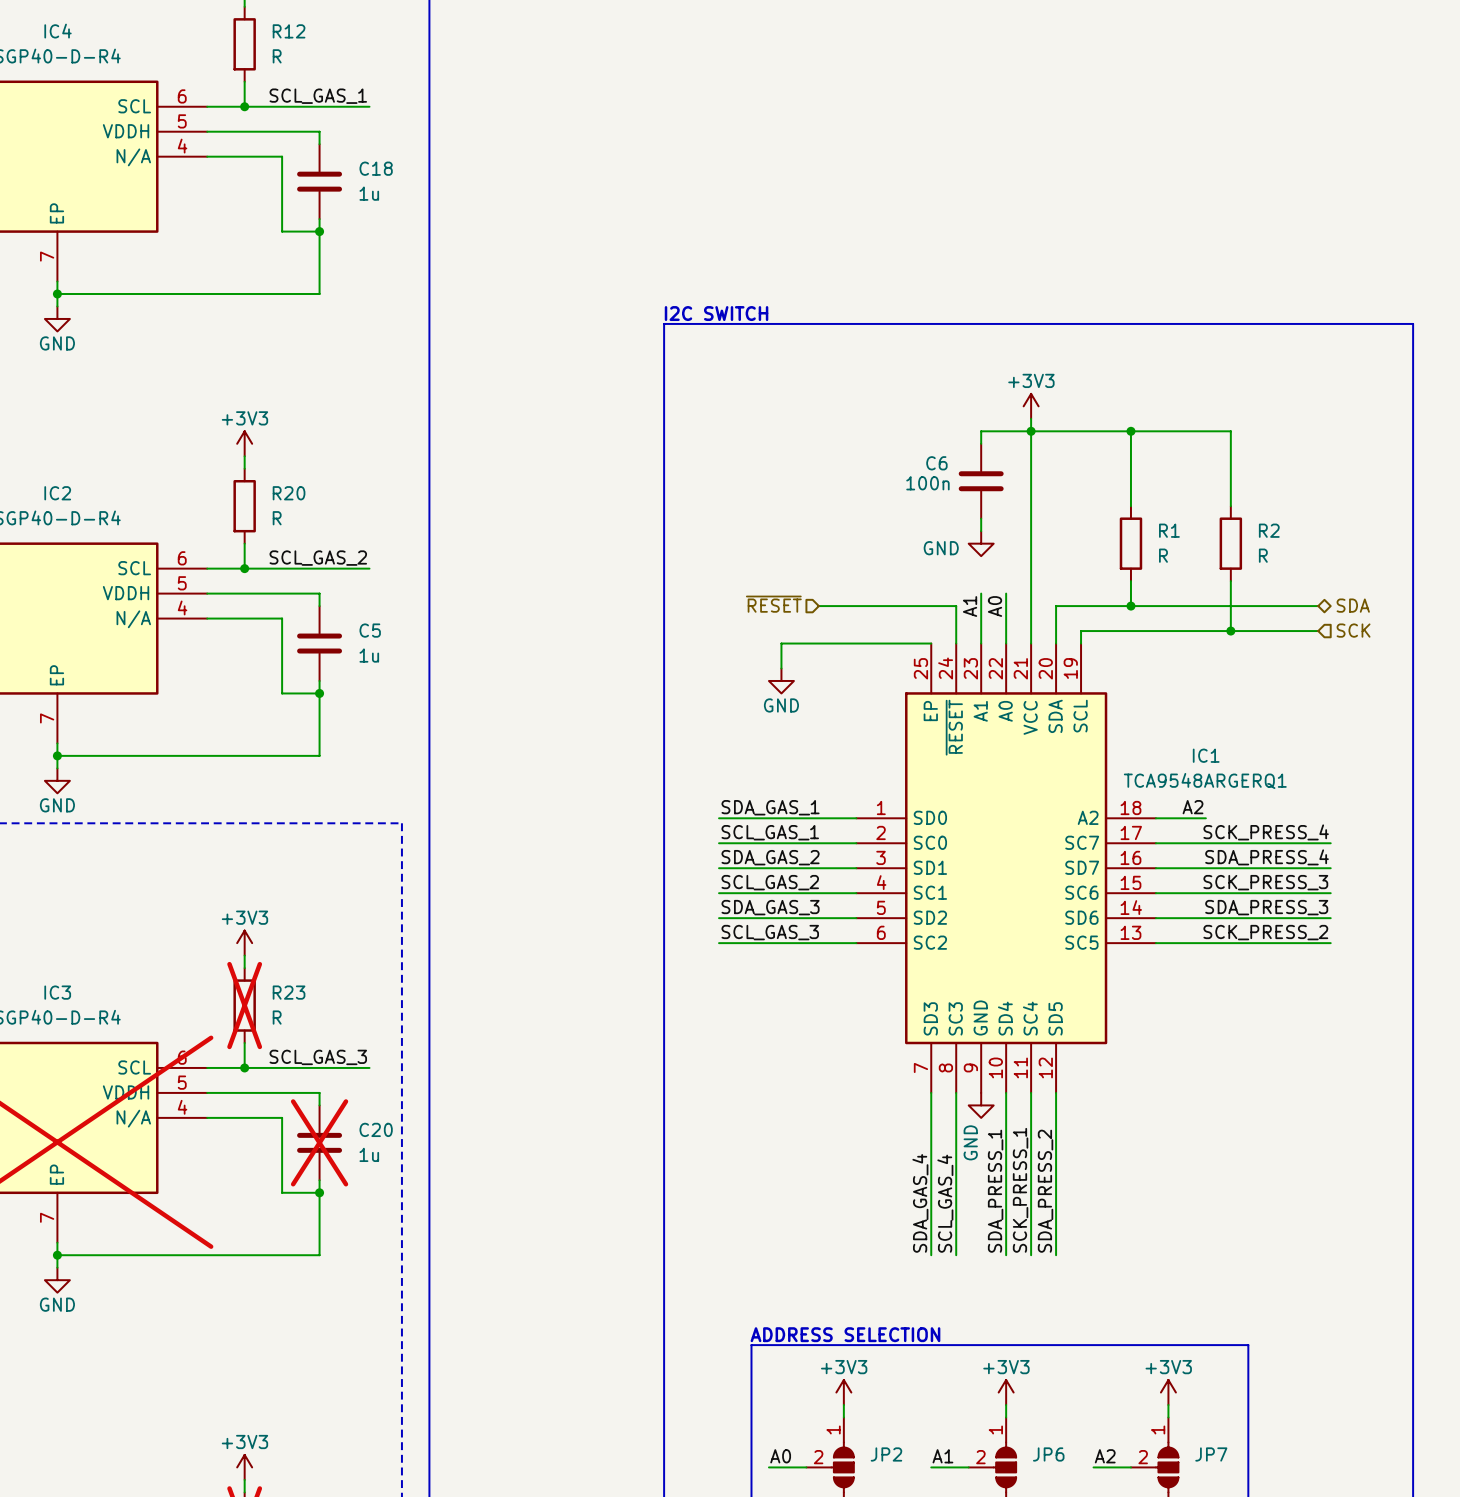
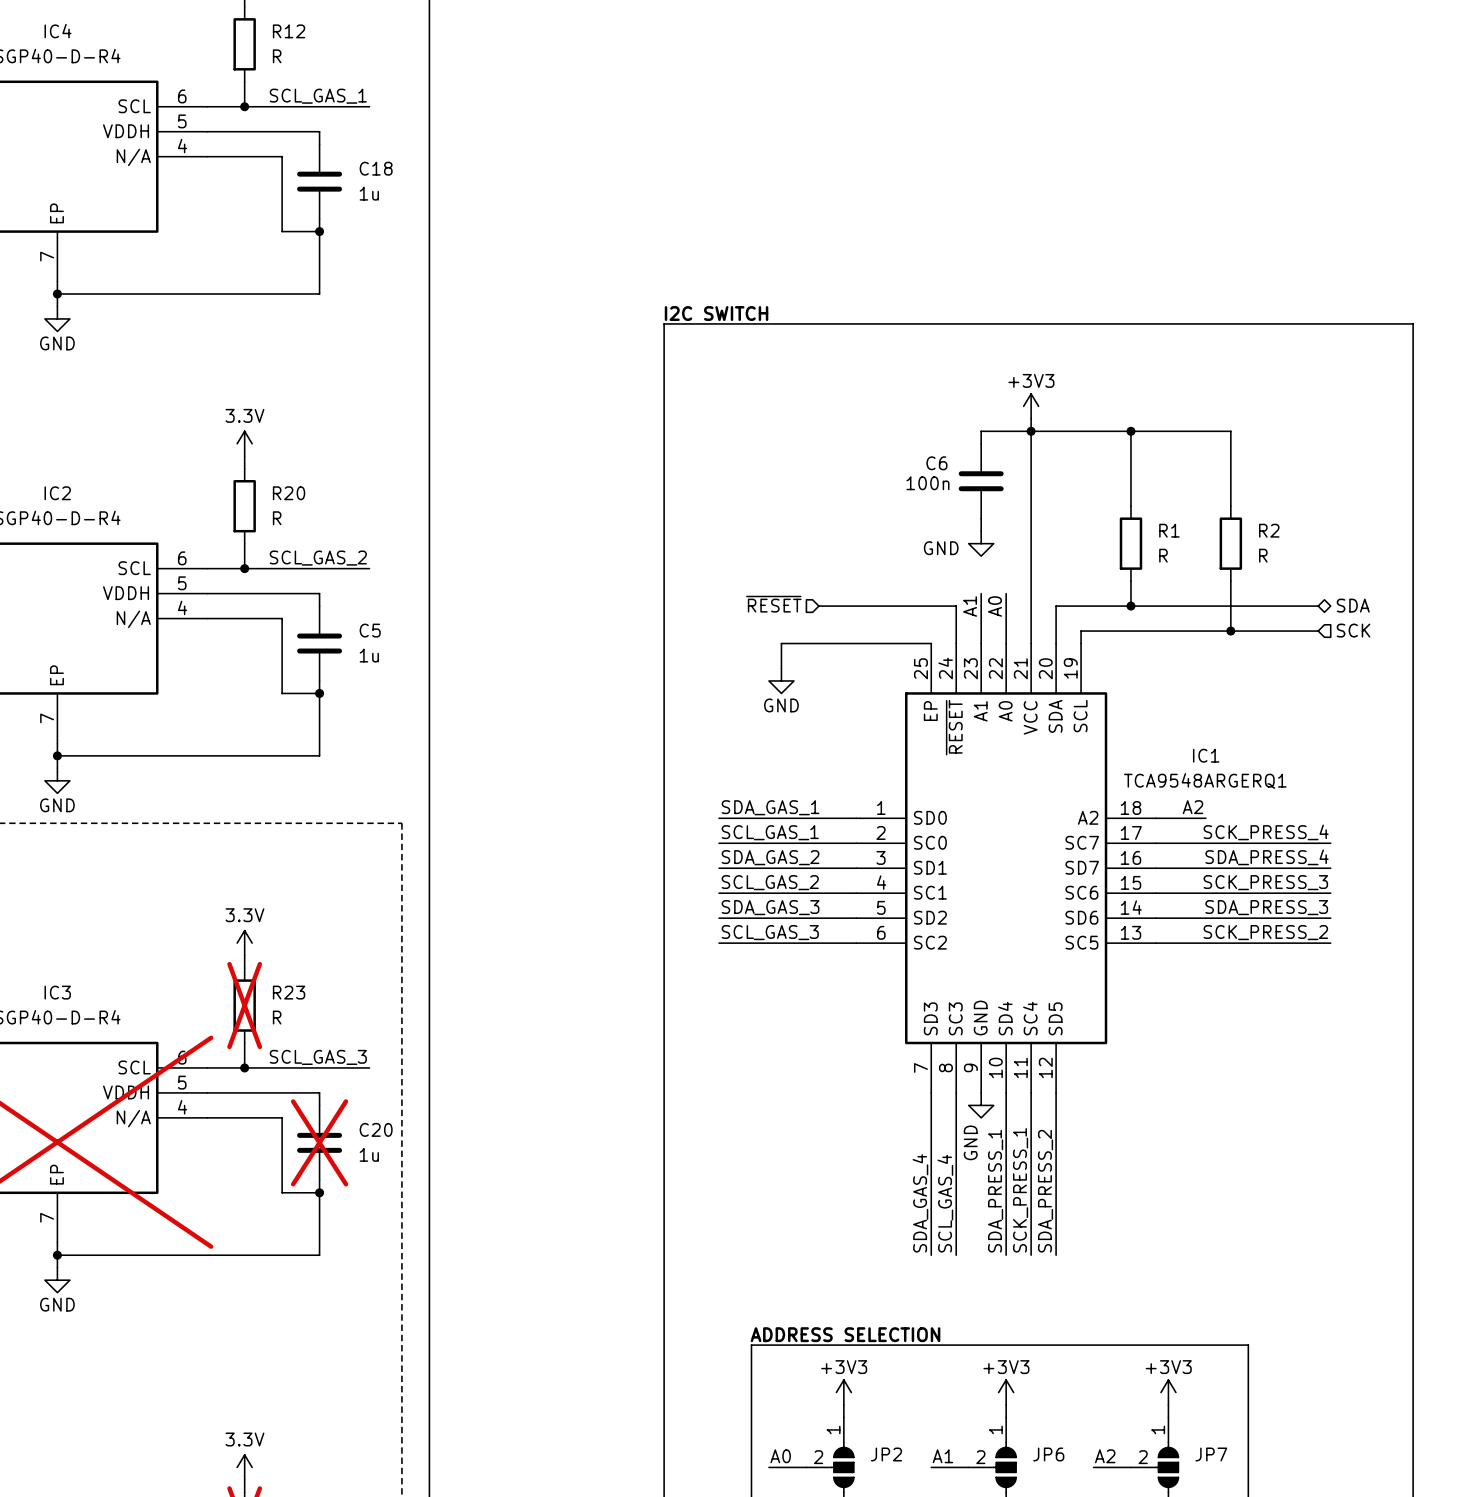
power symbol: +3V3 (244, 443) -> 3.3V (244, 443)
power symbol: +3V3 (244, 943) -> 3.3V (244, 943)
power symbol: +3V3 (244, 1467) -> 3.3V (244, 1467)

